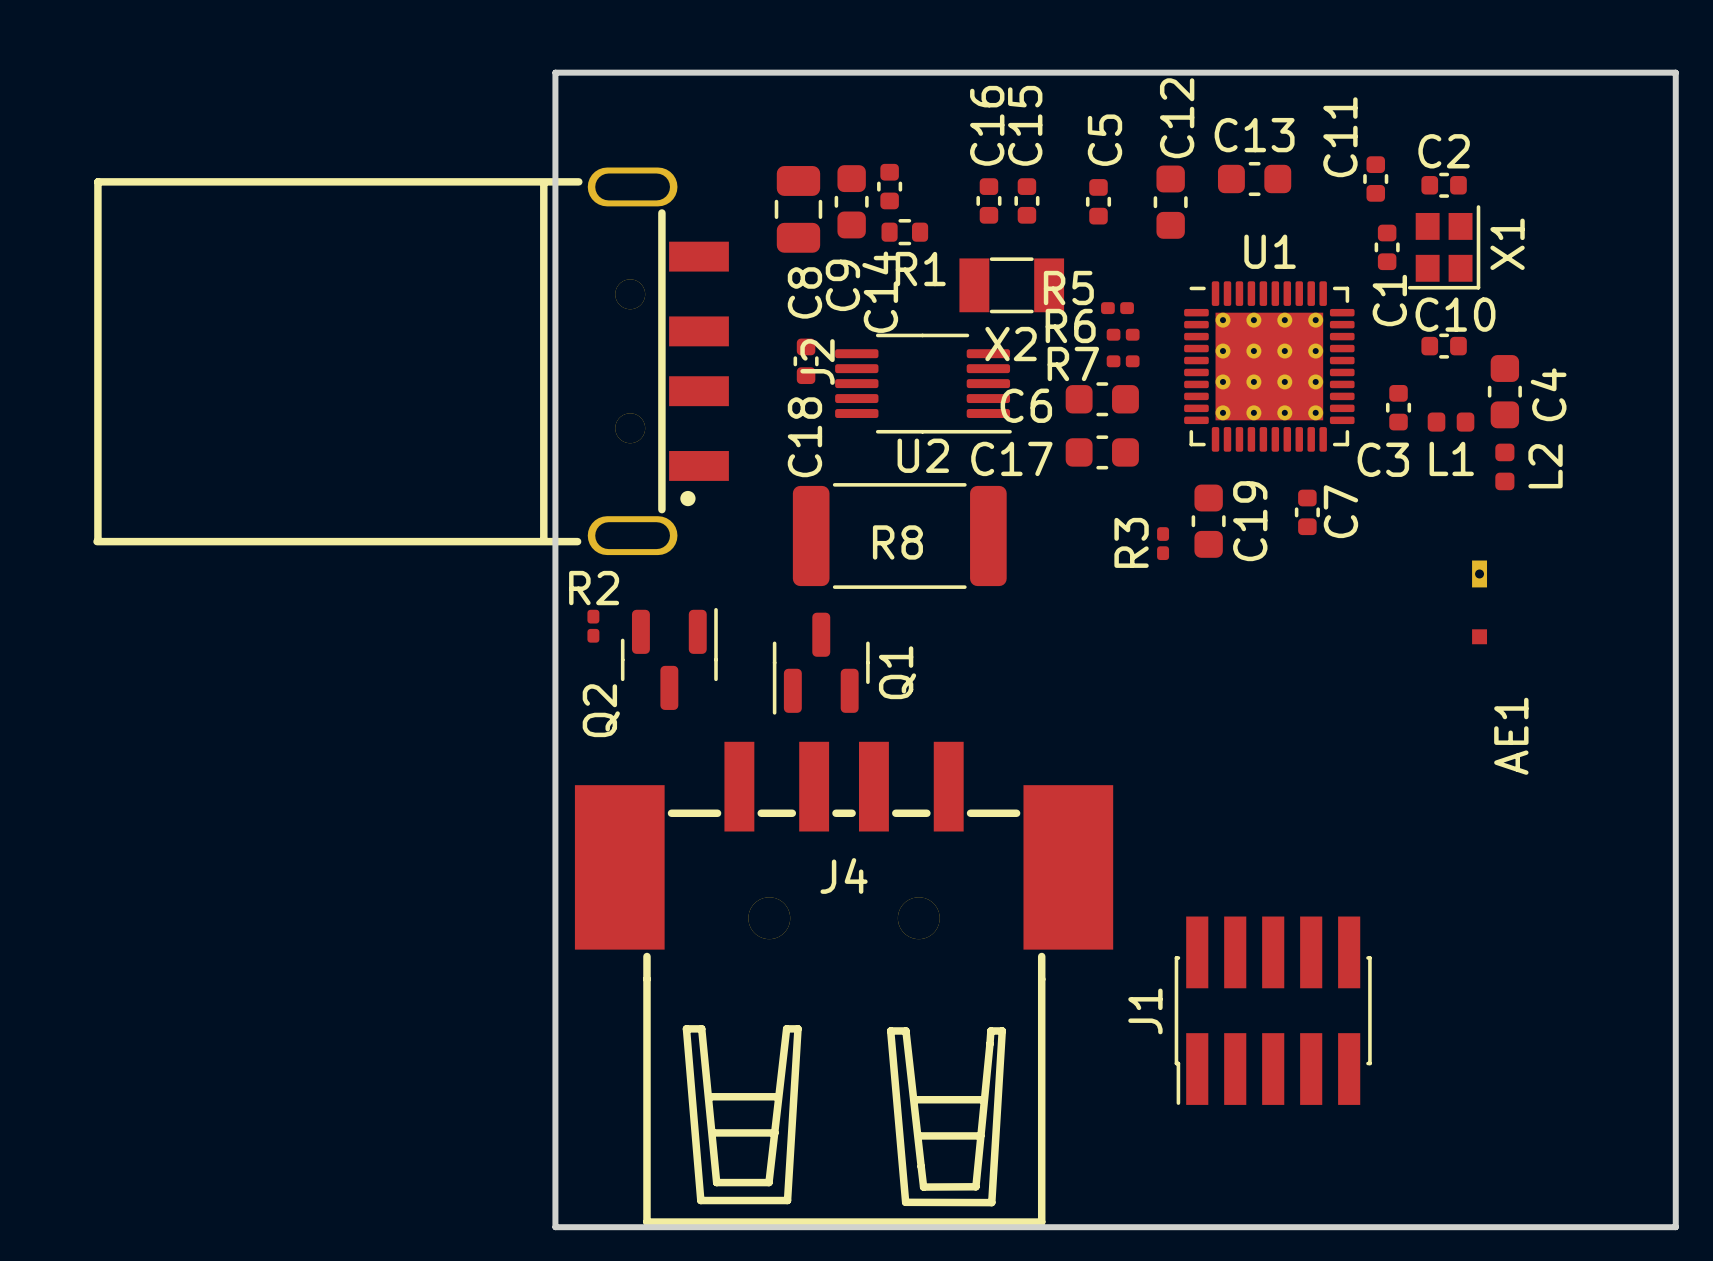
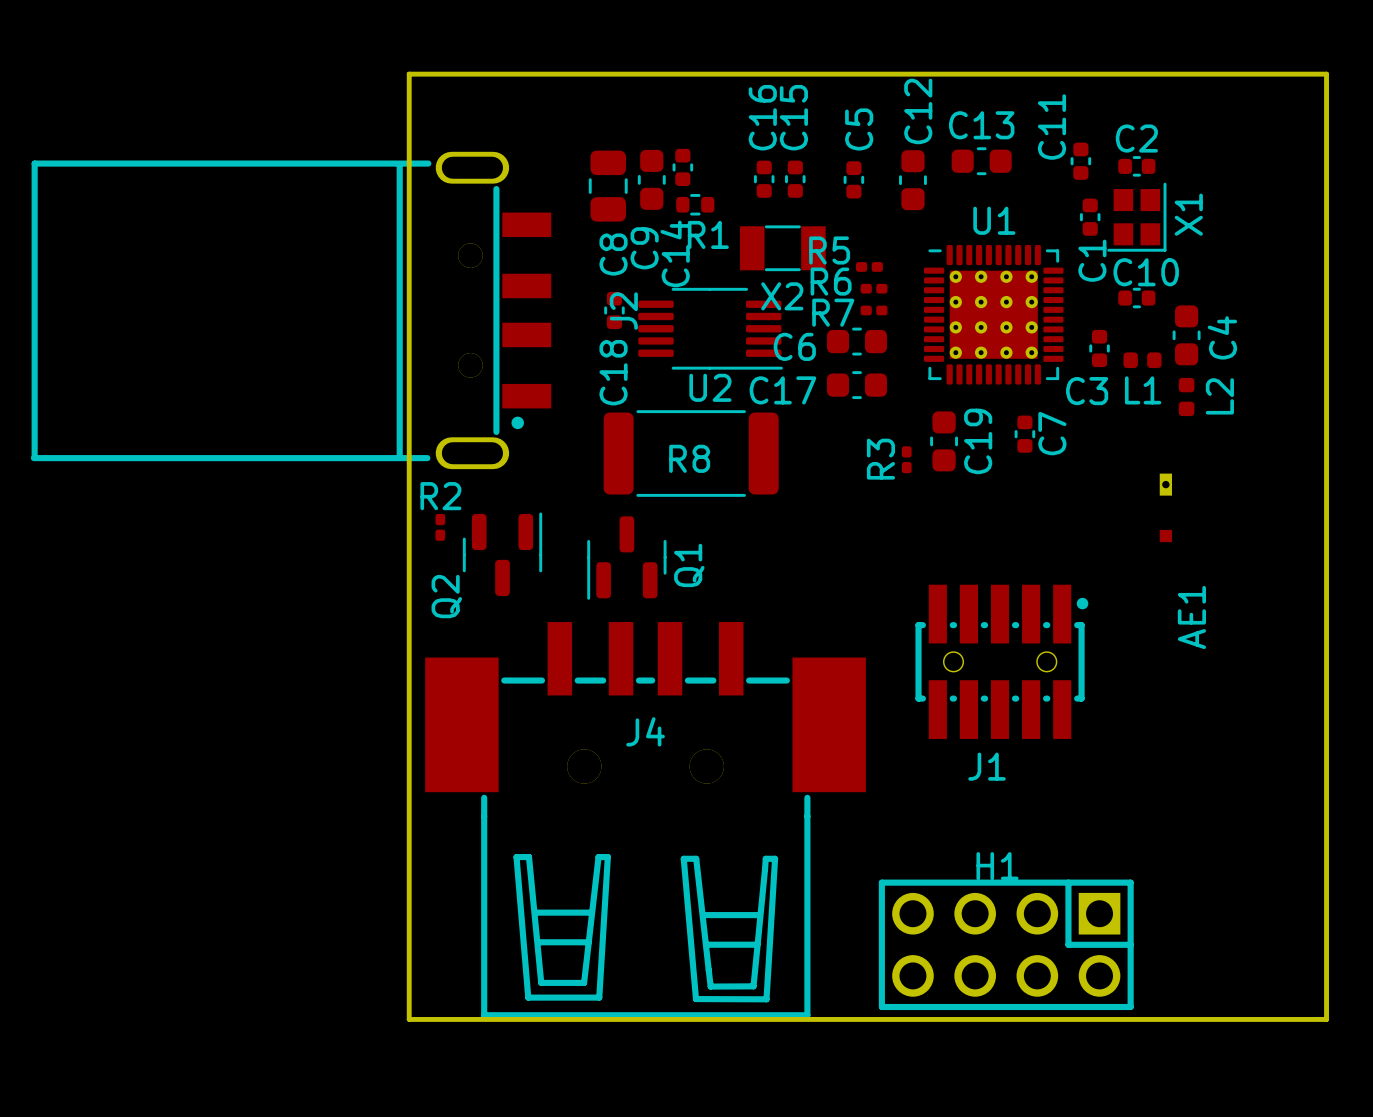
J1 footprint: [1174, 916, 1372, 1105] -> [915, 584, 1089, 739]
J1 name position: J1 (1145, 1011) -> J1 (987, 766)
H1: none -> (1006, 944)

